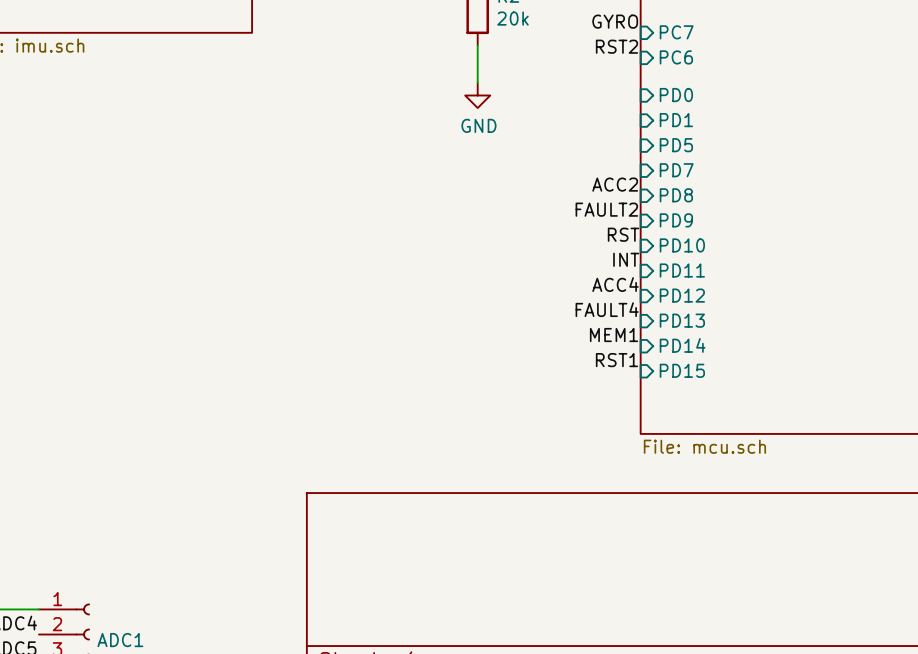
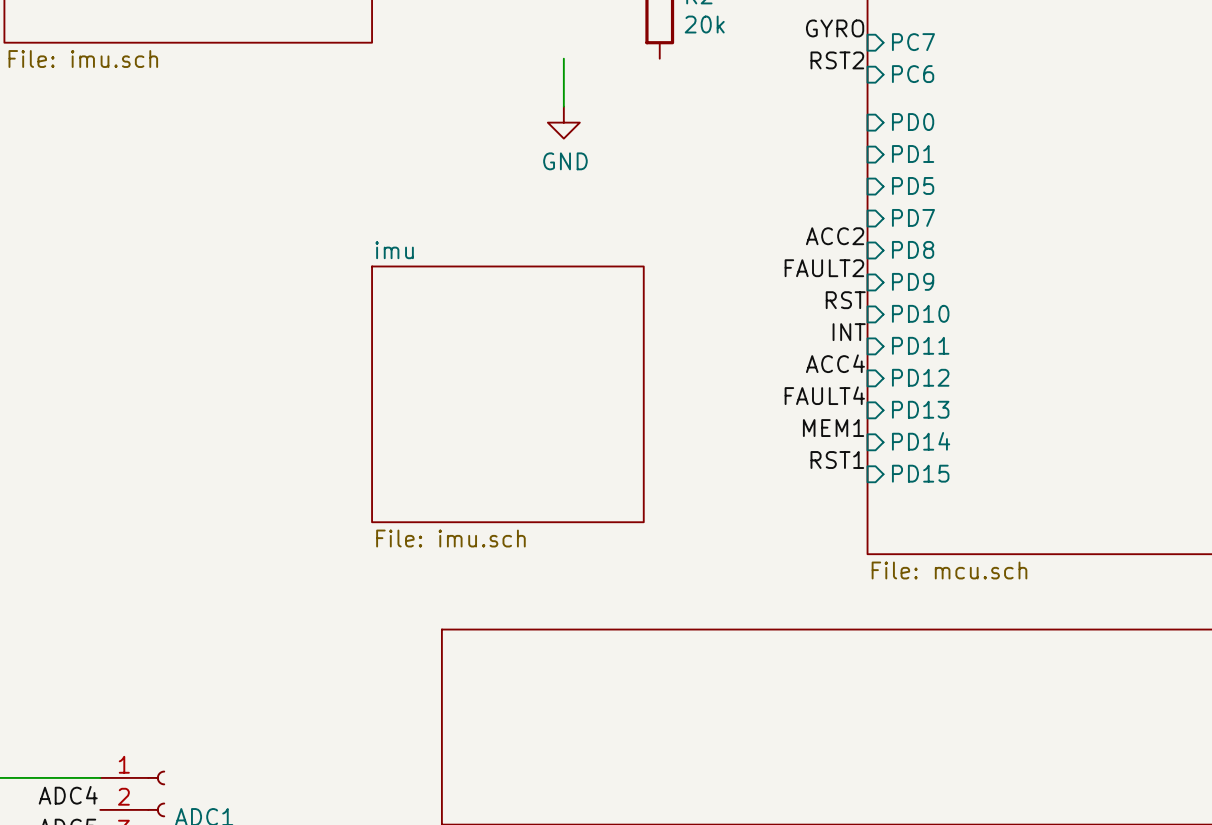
wire: (477, 45) (477, 82) -> (563, 58) (563, 106)
power symbol position: GND (477, 95) -> GND (563, 122)
sheet imu: none -> File: imu.sch (507, 394)

